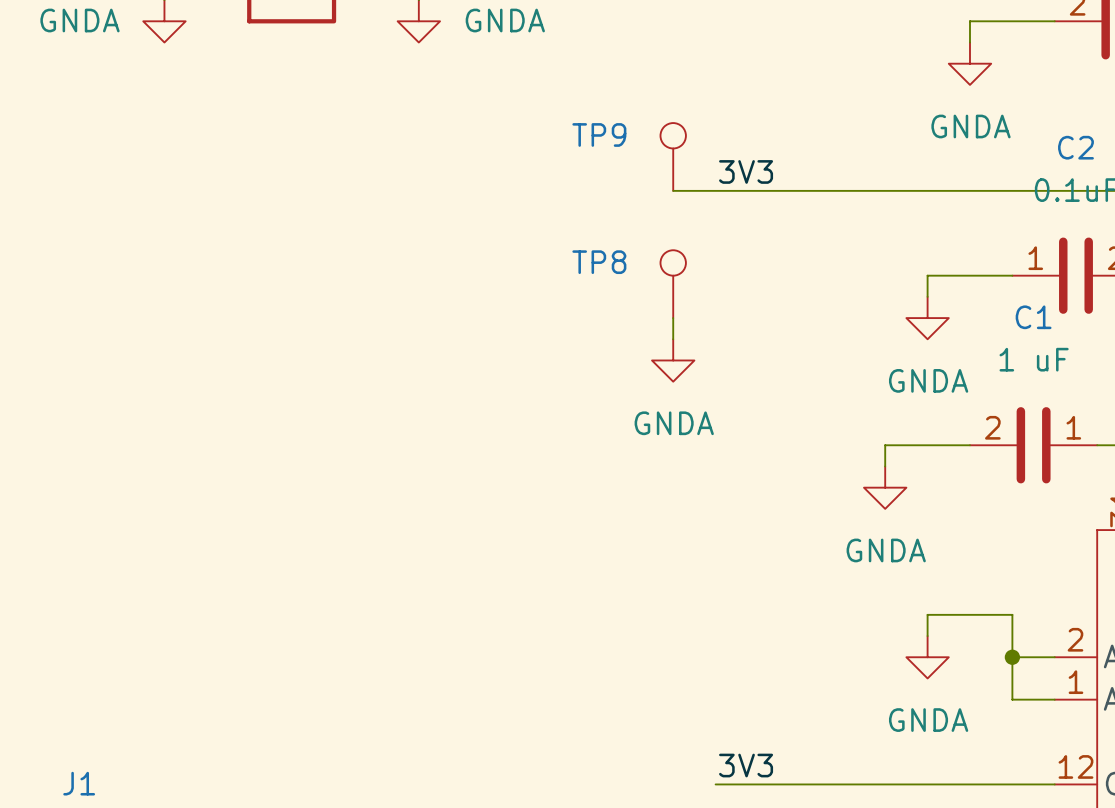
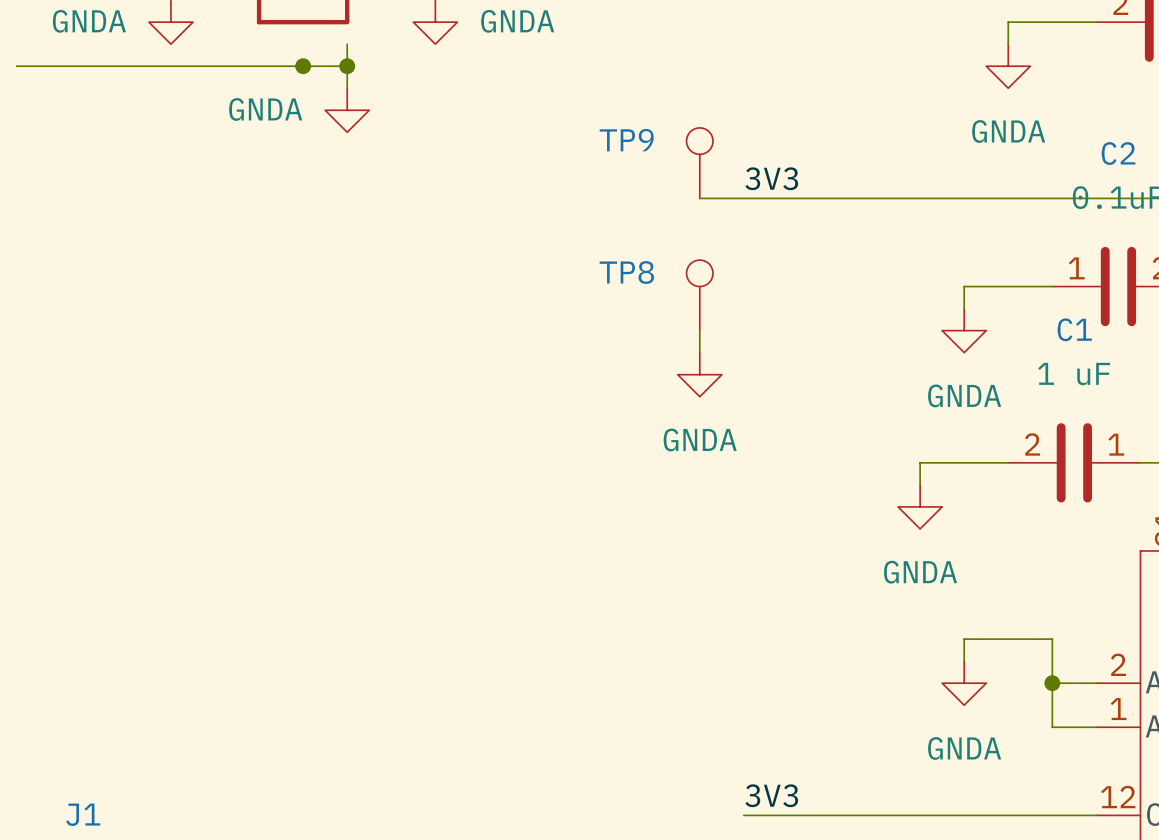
wire: none -> (347, 44) (347, 88)
wire: none -> (16, 66) (347, 66)
junction: none -> (303, 66)
junction: none -> (347, 66)
power symbol: none -> GNDA (347, 110)

